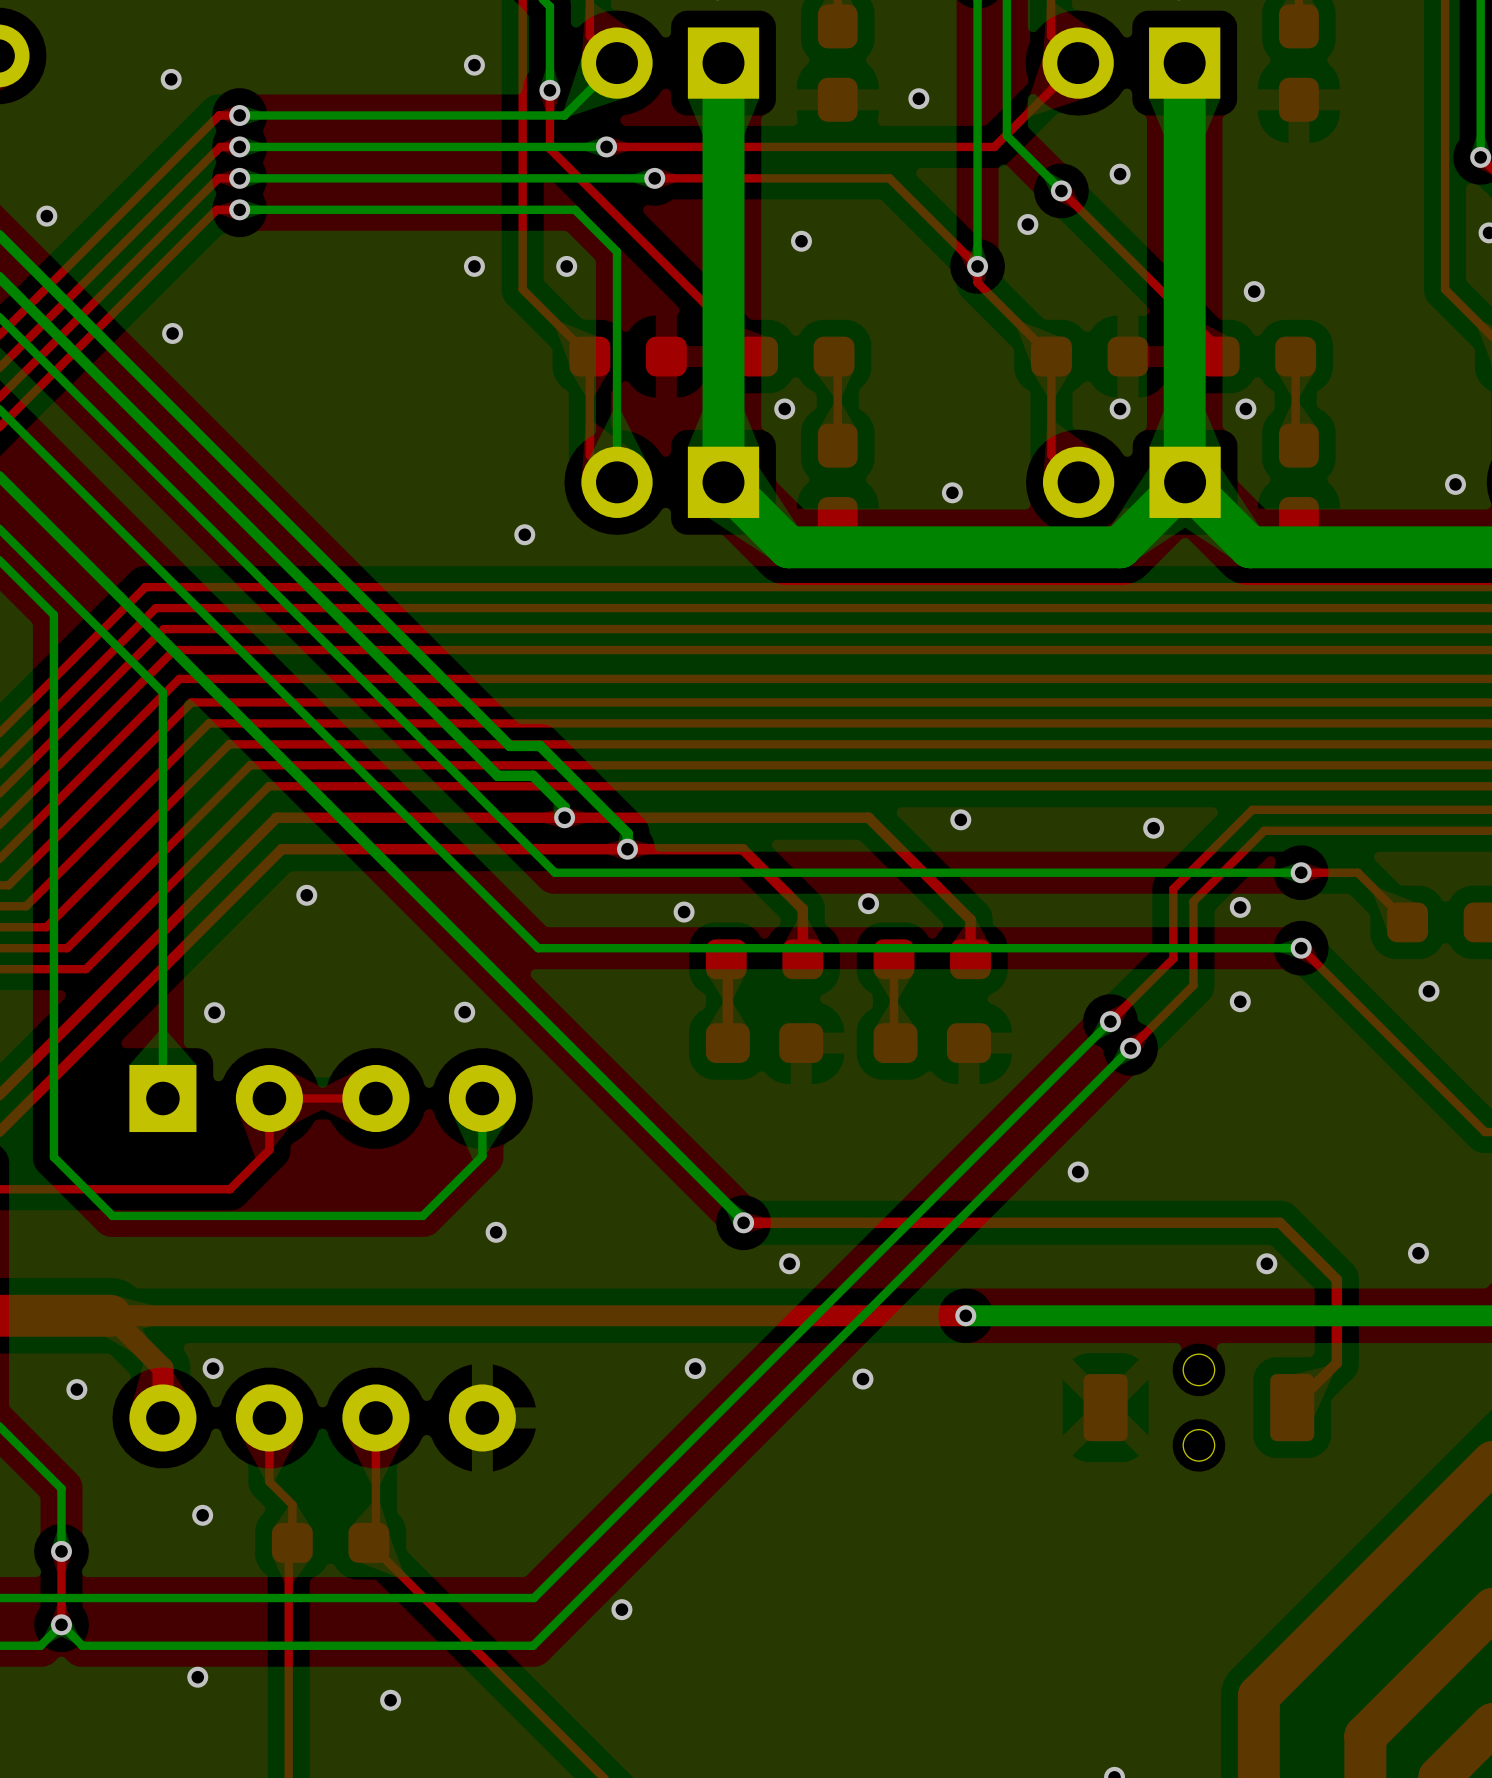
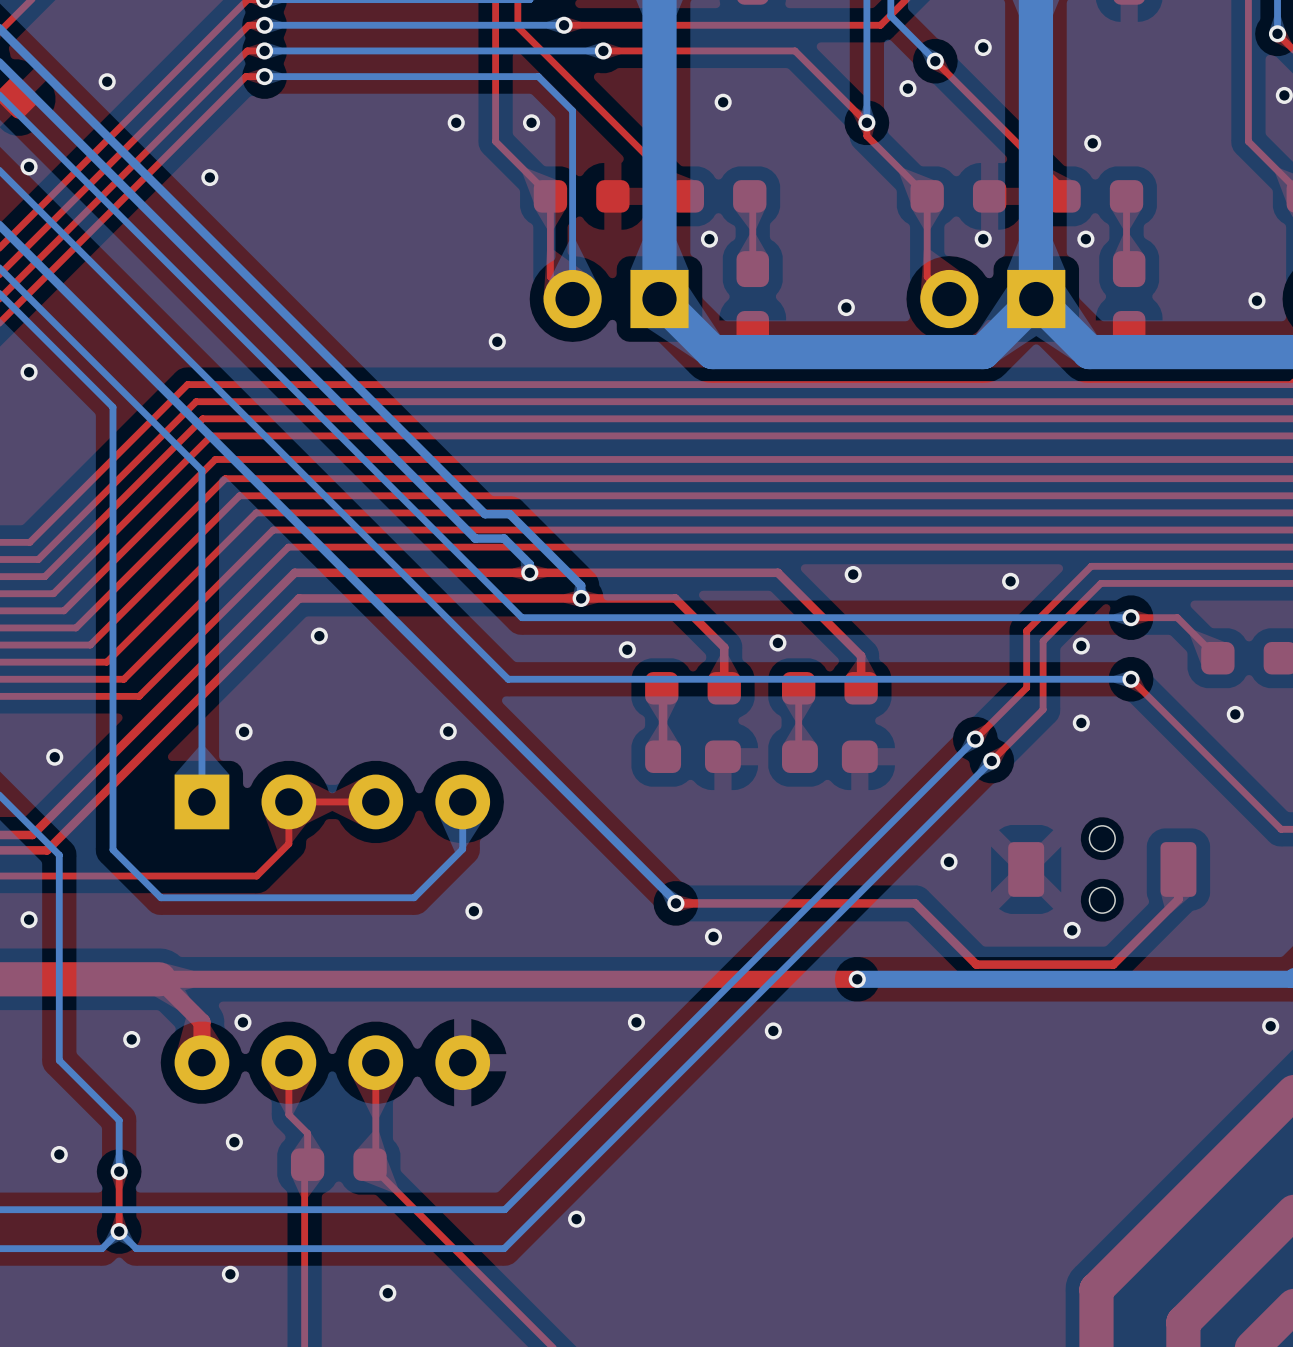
top track: (1036, 1222) (1279, 1222) (1336, 1279) (1336, 1363) (1292, 1407) -> (915, 903) (976, 964) (1113, 964) (1178, 899) (1178, 869)
via: (1418, 1253) -> none
via position: (1266, 1263) -> (1072, 930)
via: none -> (1270, 1026)
part position: (1198, 1407) -> (1102, 869)

